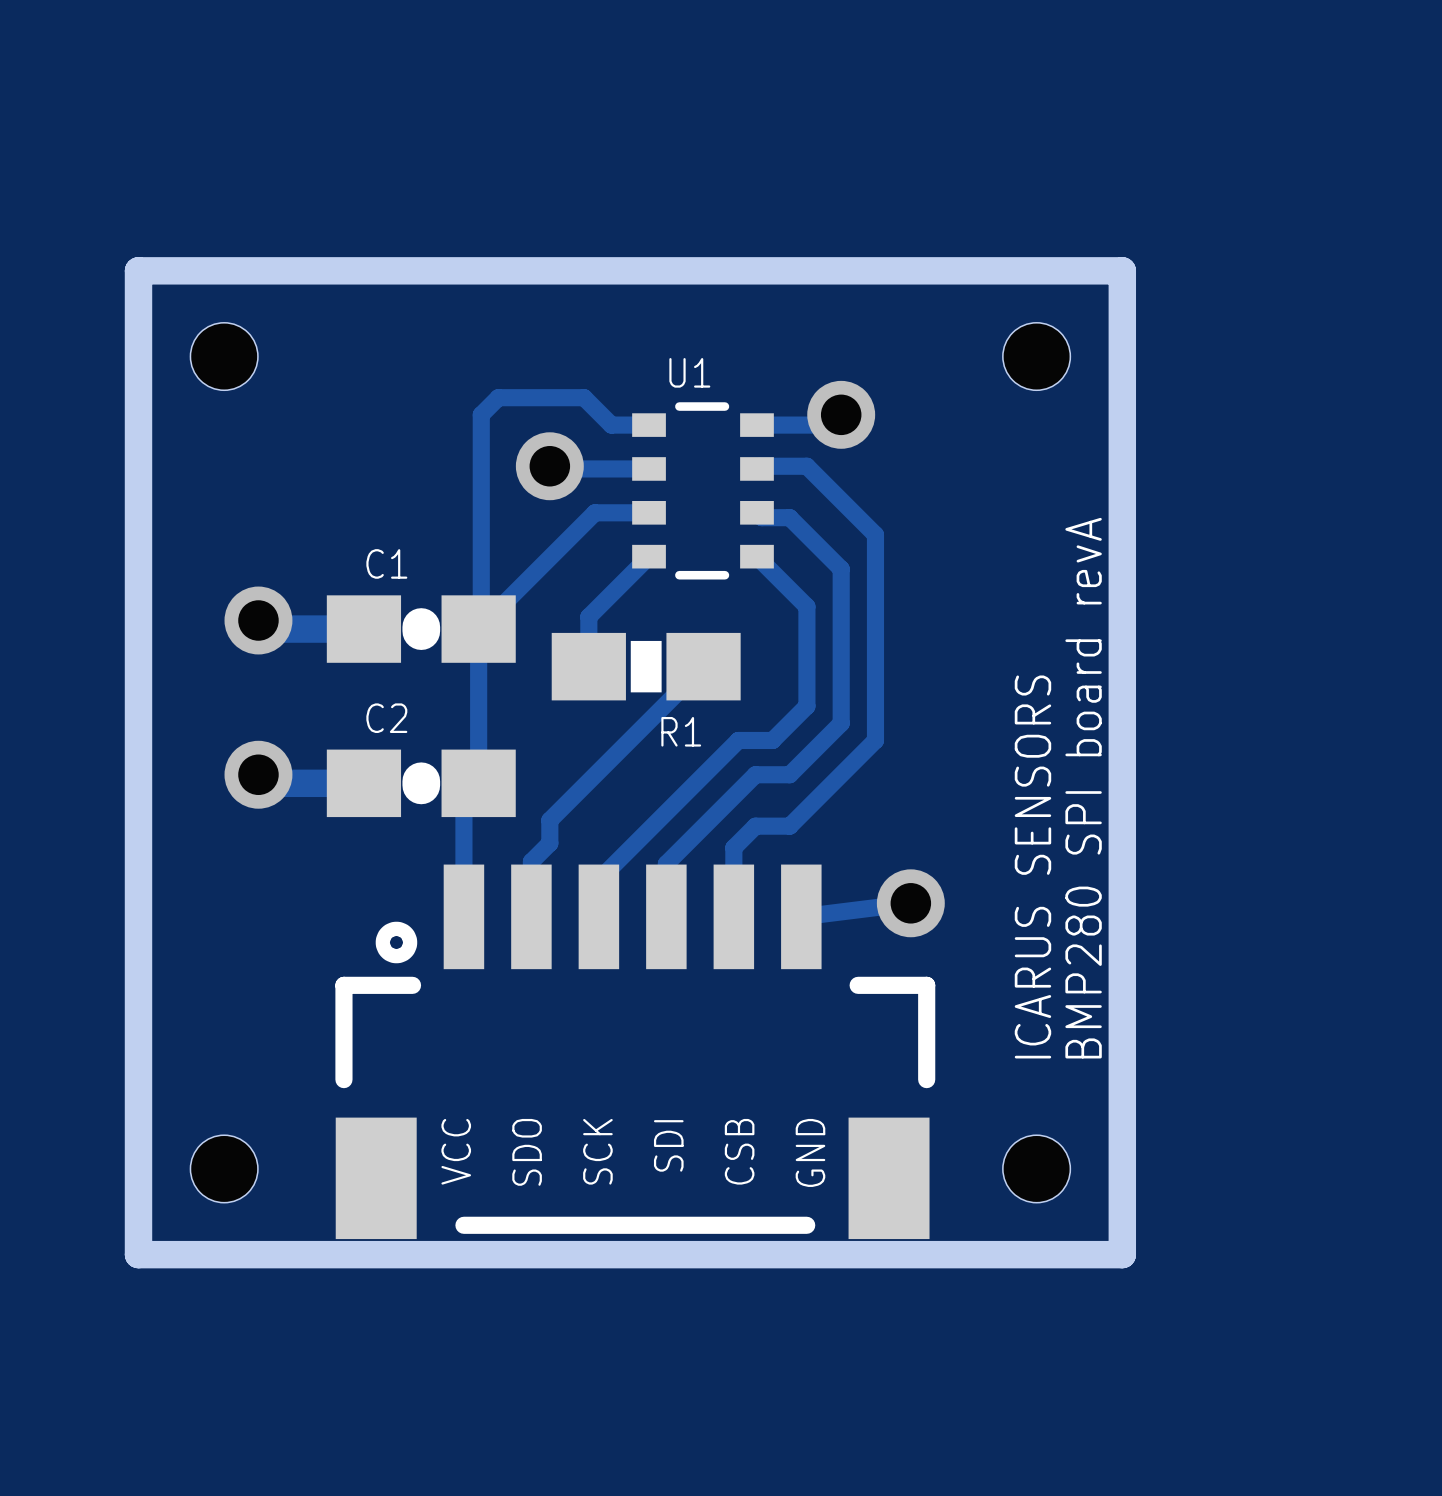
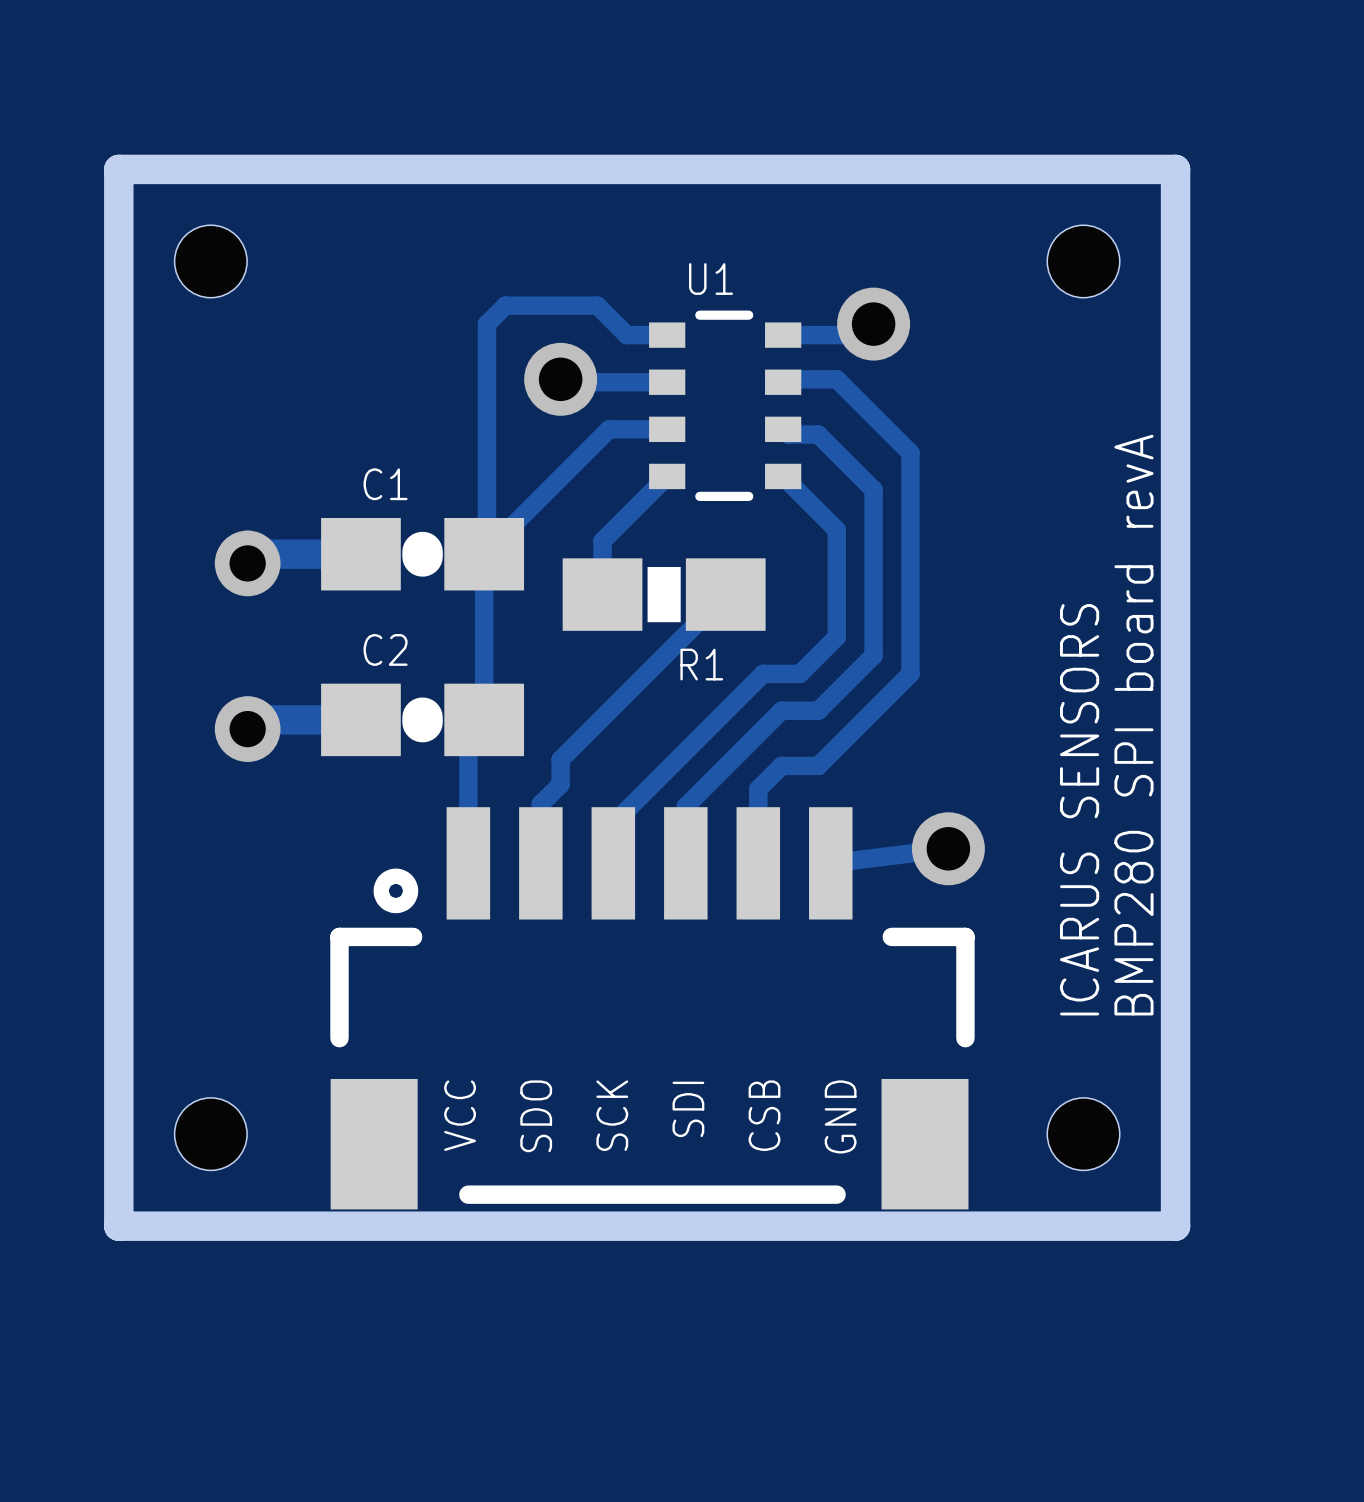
via position: (258, 620) -> (247, 563)
via position: (258, 774) -> (247, 729)

